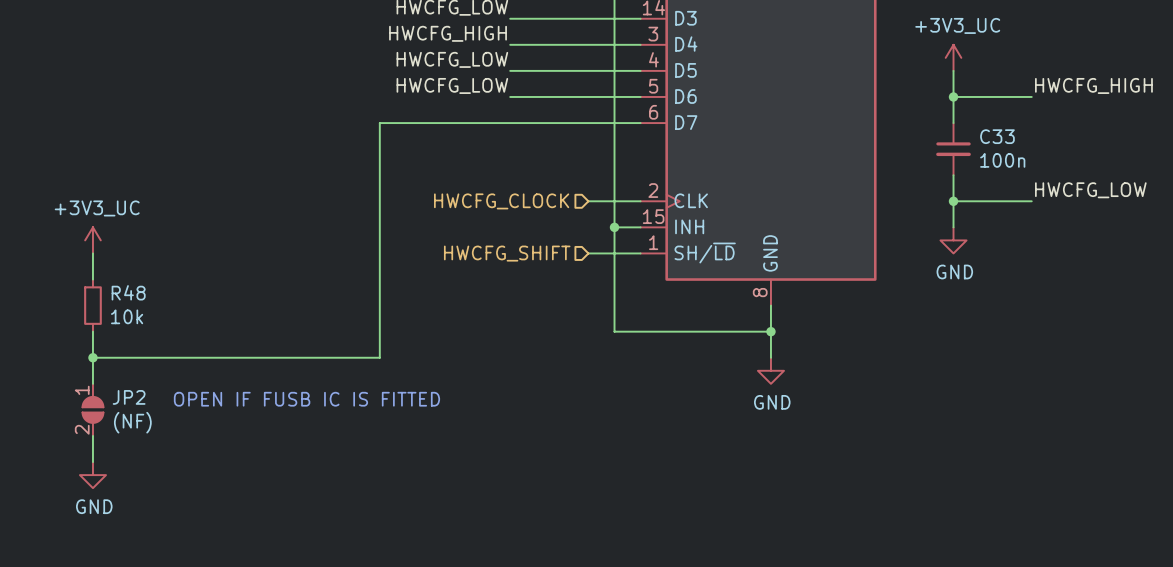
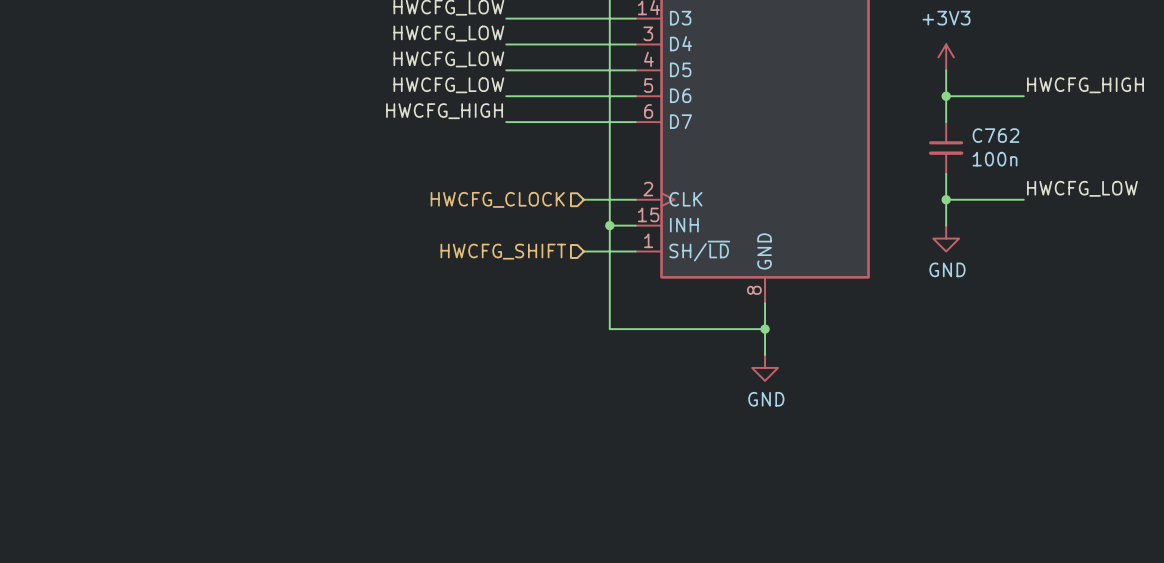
label: HWCFG_HIGH (448, 33) -> HWCFG_LOW (448, 33)
power symbol: +3V3_UC (953, 57) -> +3V3 (946, 57)
label: none -> HWCFG_HIGH (444, 111)
wire: (510, 123) (379, 123) (379, 357) (92, 357) -> none
C33 name: C33 (997, 136) -> C762 (995, 135)
power symbol: +3V3_UC (92, 240) -> none
wire: (92, 253) (92, 279) -> none
R48: 10k (92, 305) -> none
wire: (92, 331) (92, 383) -> none
junction: (92, 357) -> none
text: OPEN IF FUSB IC IS FITTED (306, 399) -> none
JP2: (NF) (92, 409) -> none
wire: (92, 435) (92, 462) -> none
power symbol: GND (92, 475) -> none

